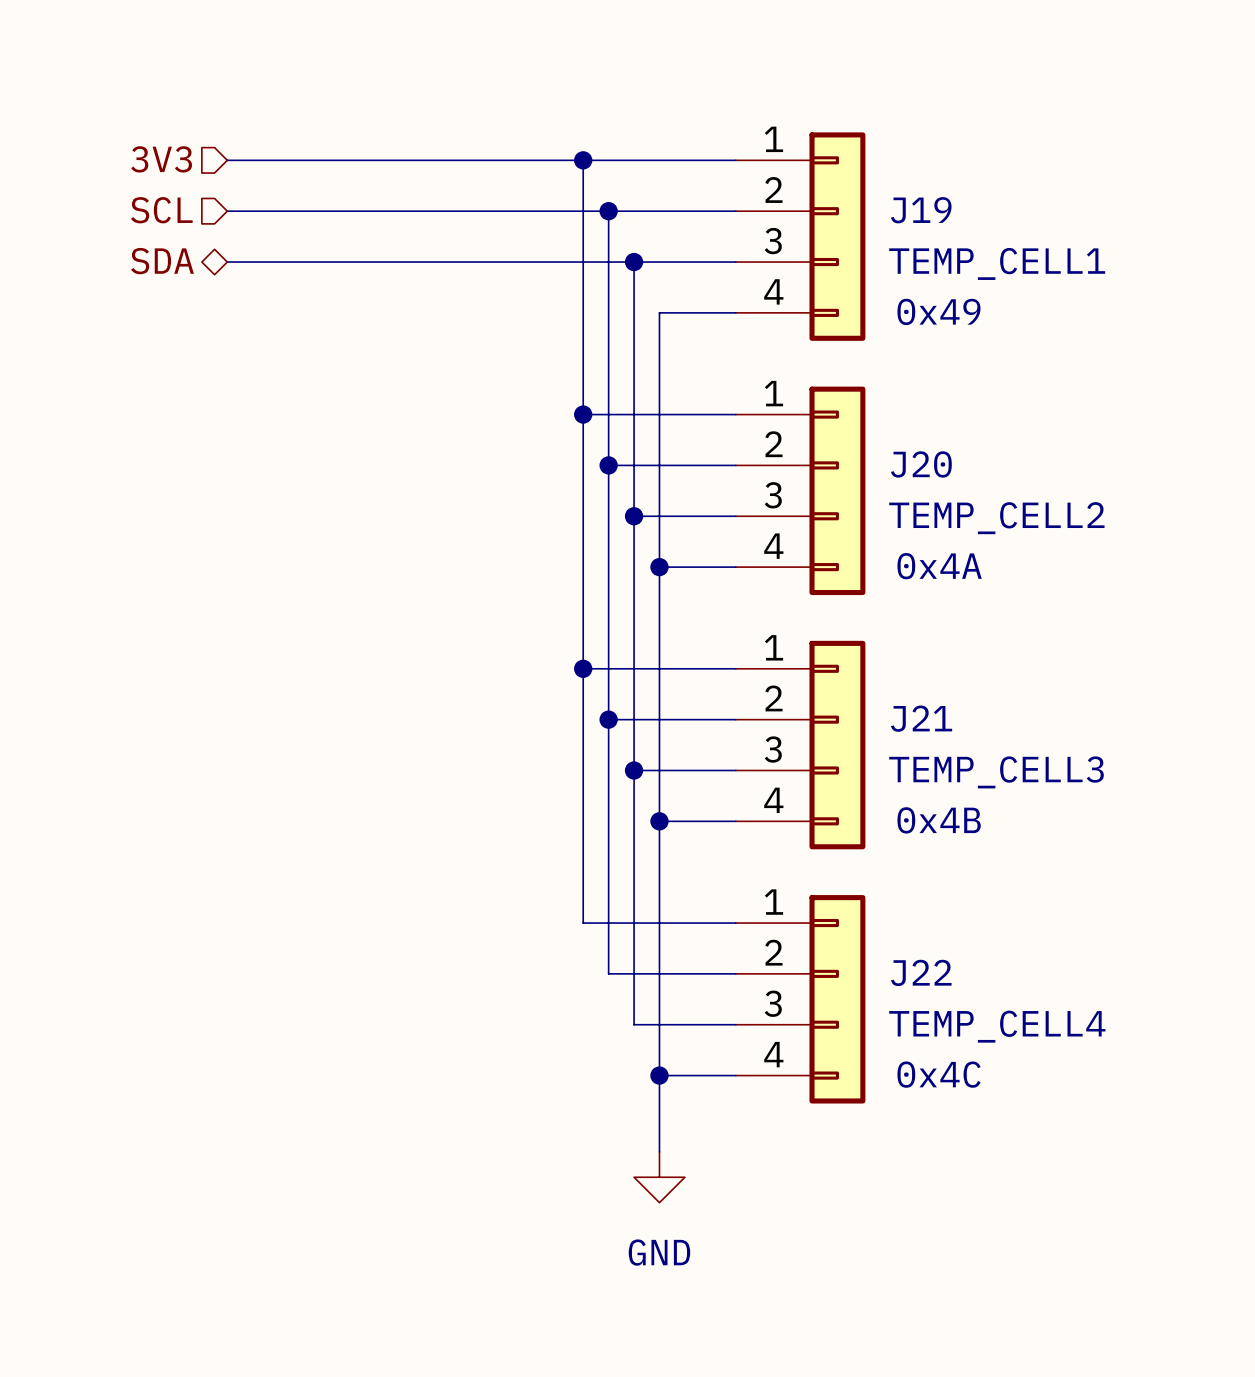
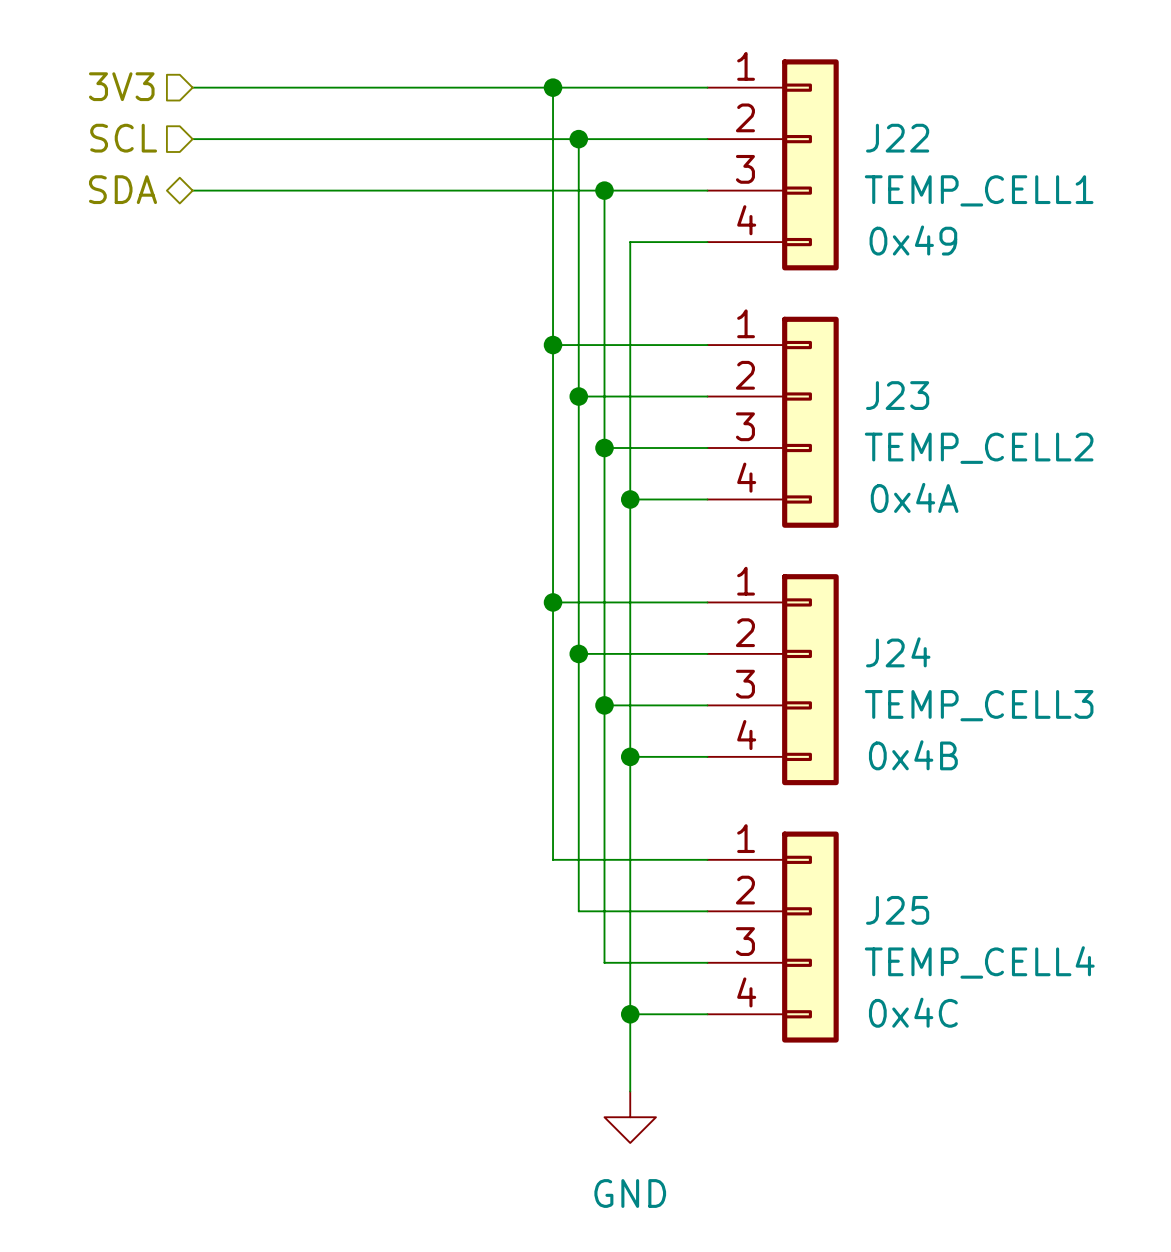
J19 name: J19 (921, 210) -> J22 (897, 138)
J20 name: J20 (921, 464) -> J23 (897, 395)
J21 name: J21 (921, 718) -> J24 (898, 652)
J22 name: J22 (921, 972) -> J25 (897, 910)

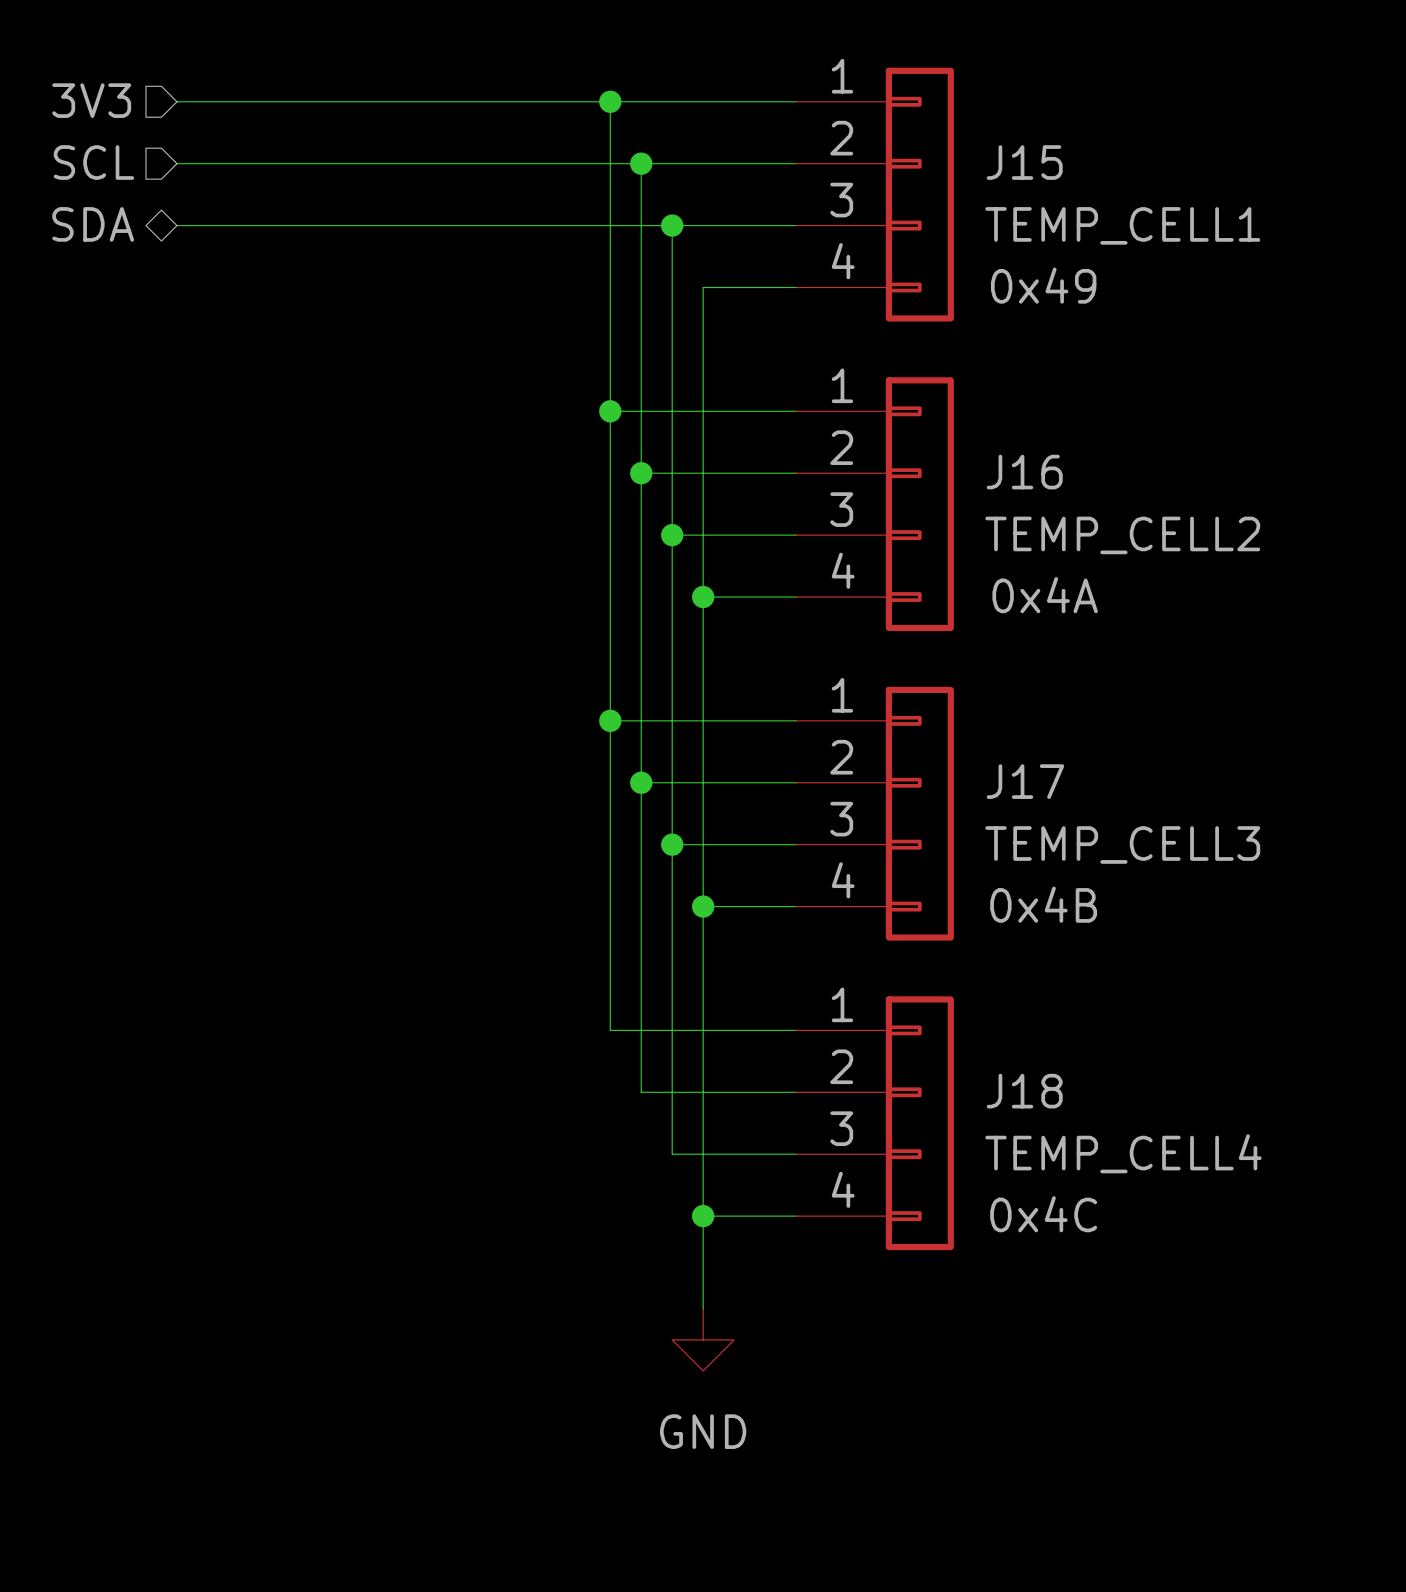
J22 name: J22 (897, 138) -> J15 (1024, 162)
J23 name: J23 (897, 395) -> J16 (1024, 472)
J24 name: J24 (898, 652) -> J17 (1025, 781)
J25 name: J25 (897, 910) -> J18 (1024, 1091)

